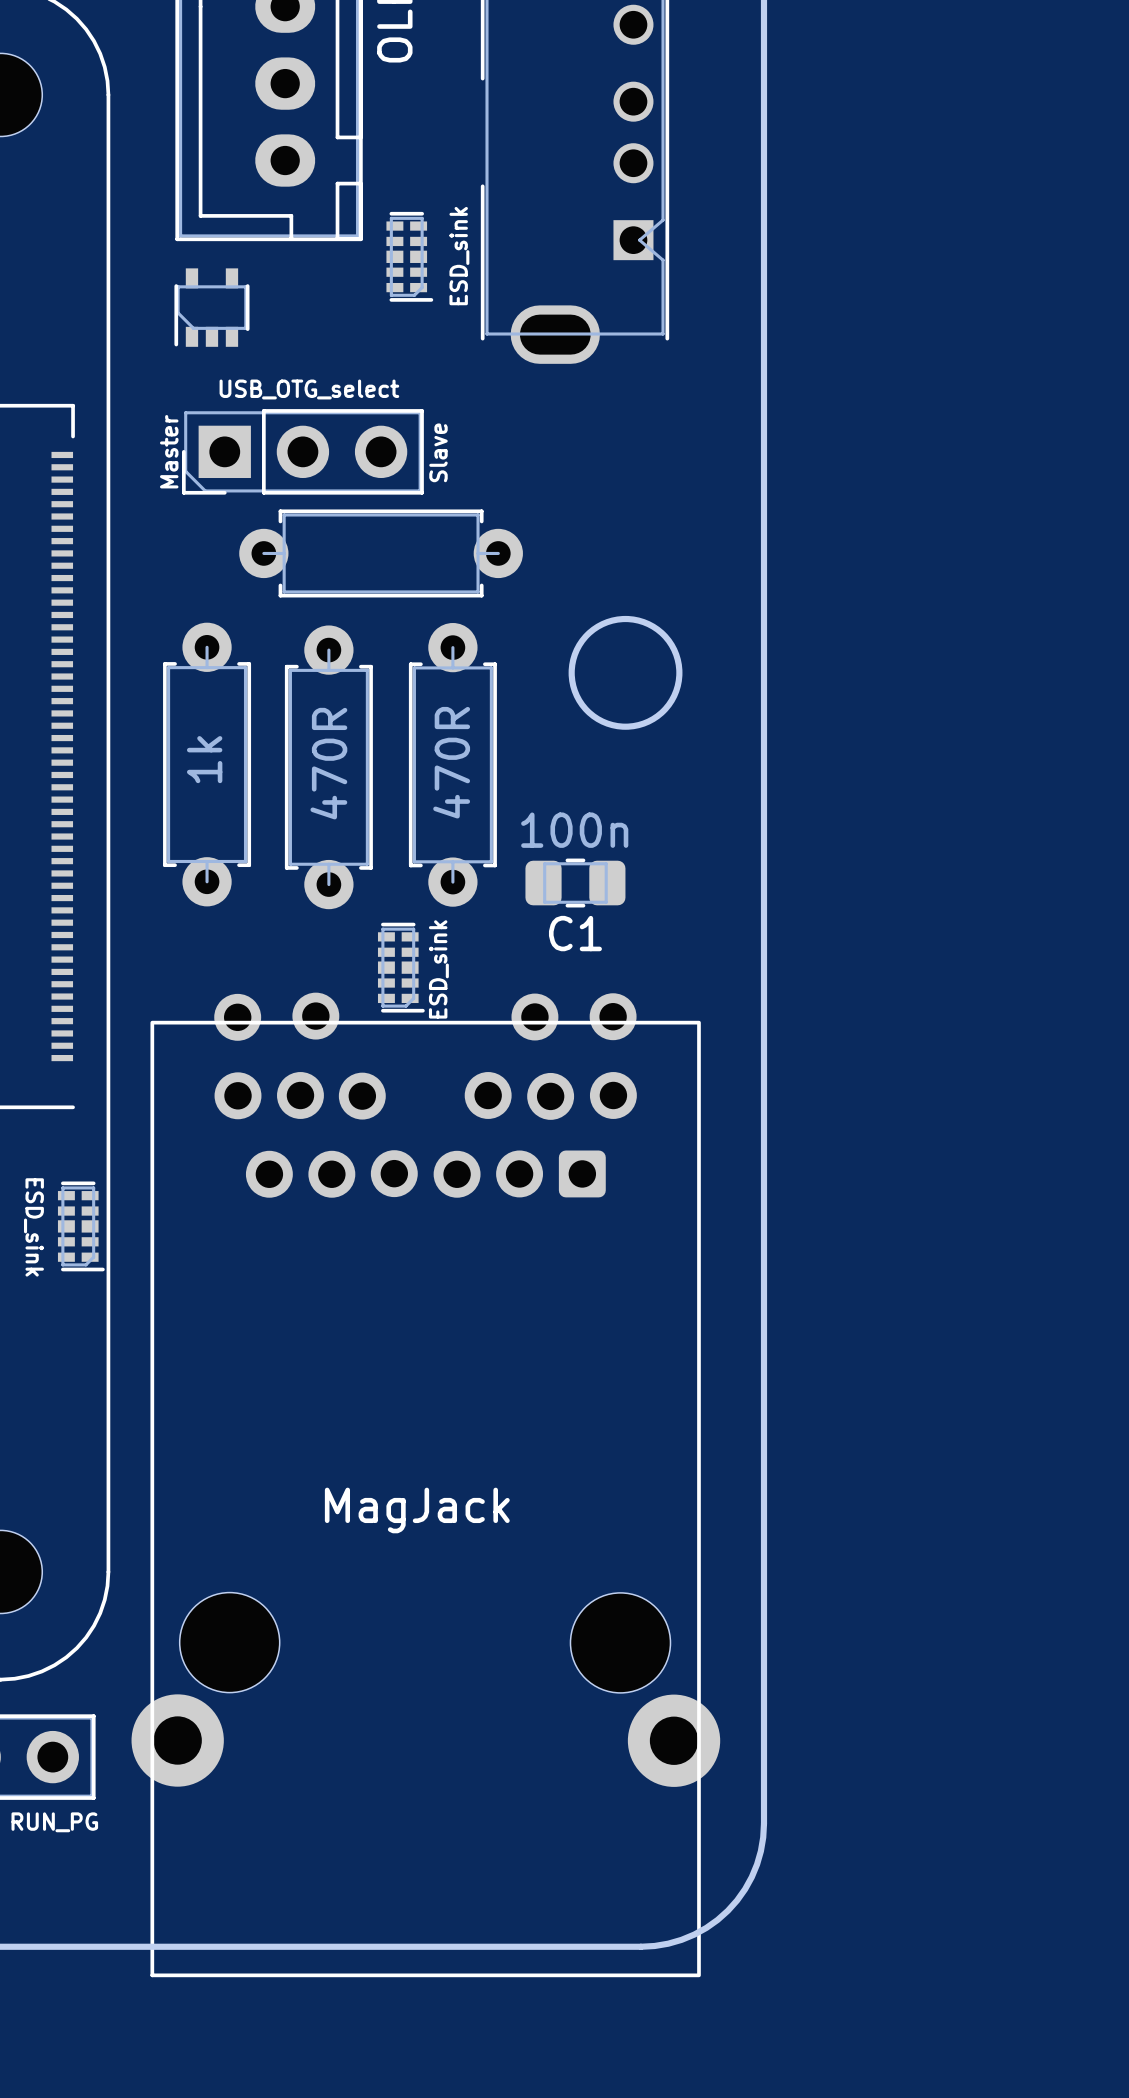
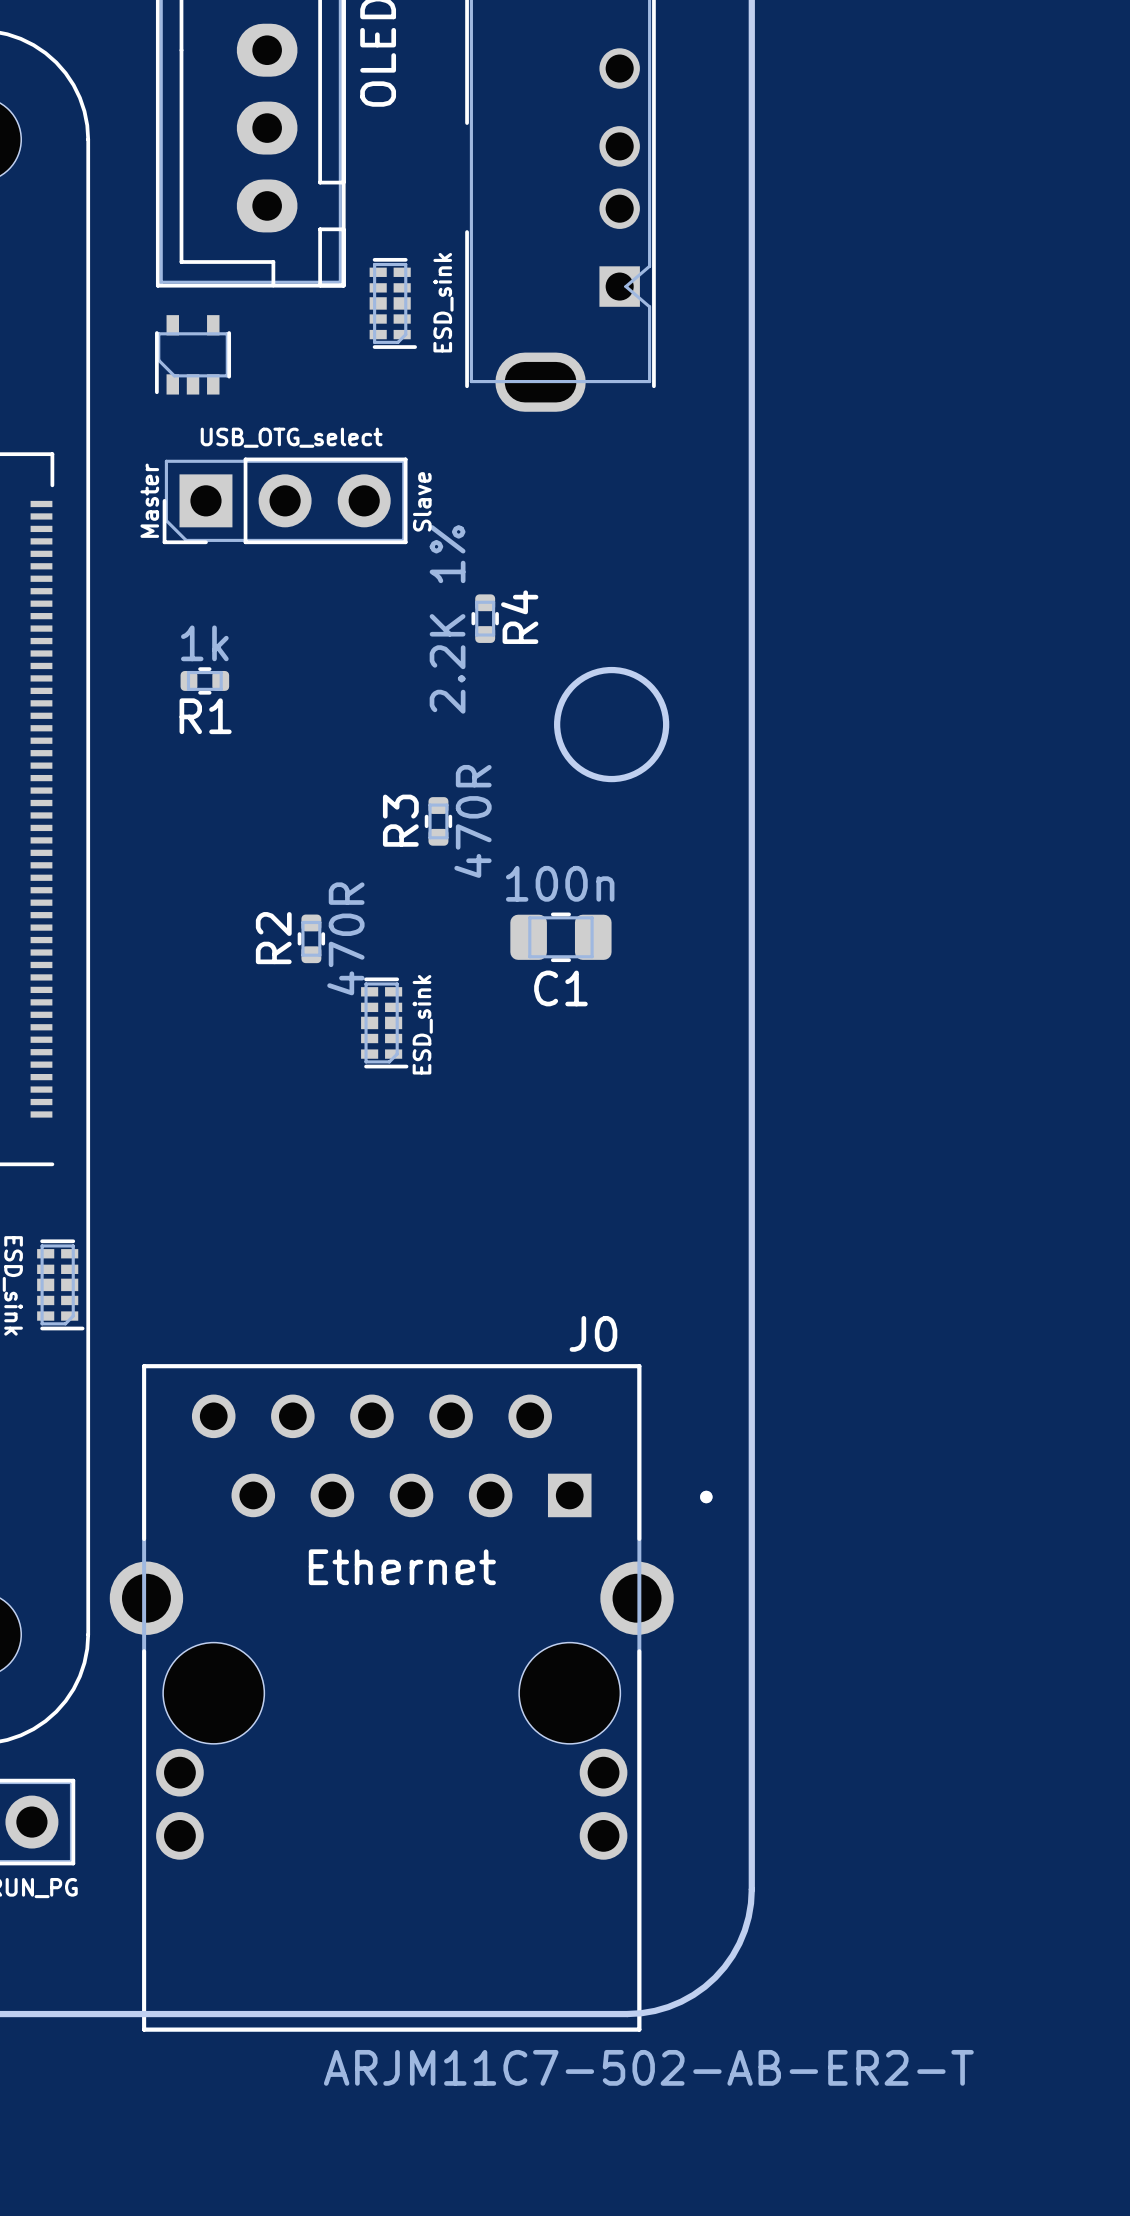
part: (381, 553) -> none
R4: none -> 2.2K 1% (485, 618)
R1: none -> 1k (204, 680)
part: 1k (207, 764) -> none
part: 470R (452, 764) -> none
part: 470R (328, 767) -> none
R3: none -> 470R (438, 821)
R2: none -> 470R (311, 938)
part: (425, 1484) -> none
text: MagJack (417, 1510) -> Ethernet (402, 1567)
J0: none -> ARJM11C7-502-AB-ER2-T (411, 1697)

